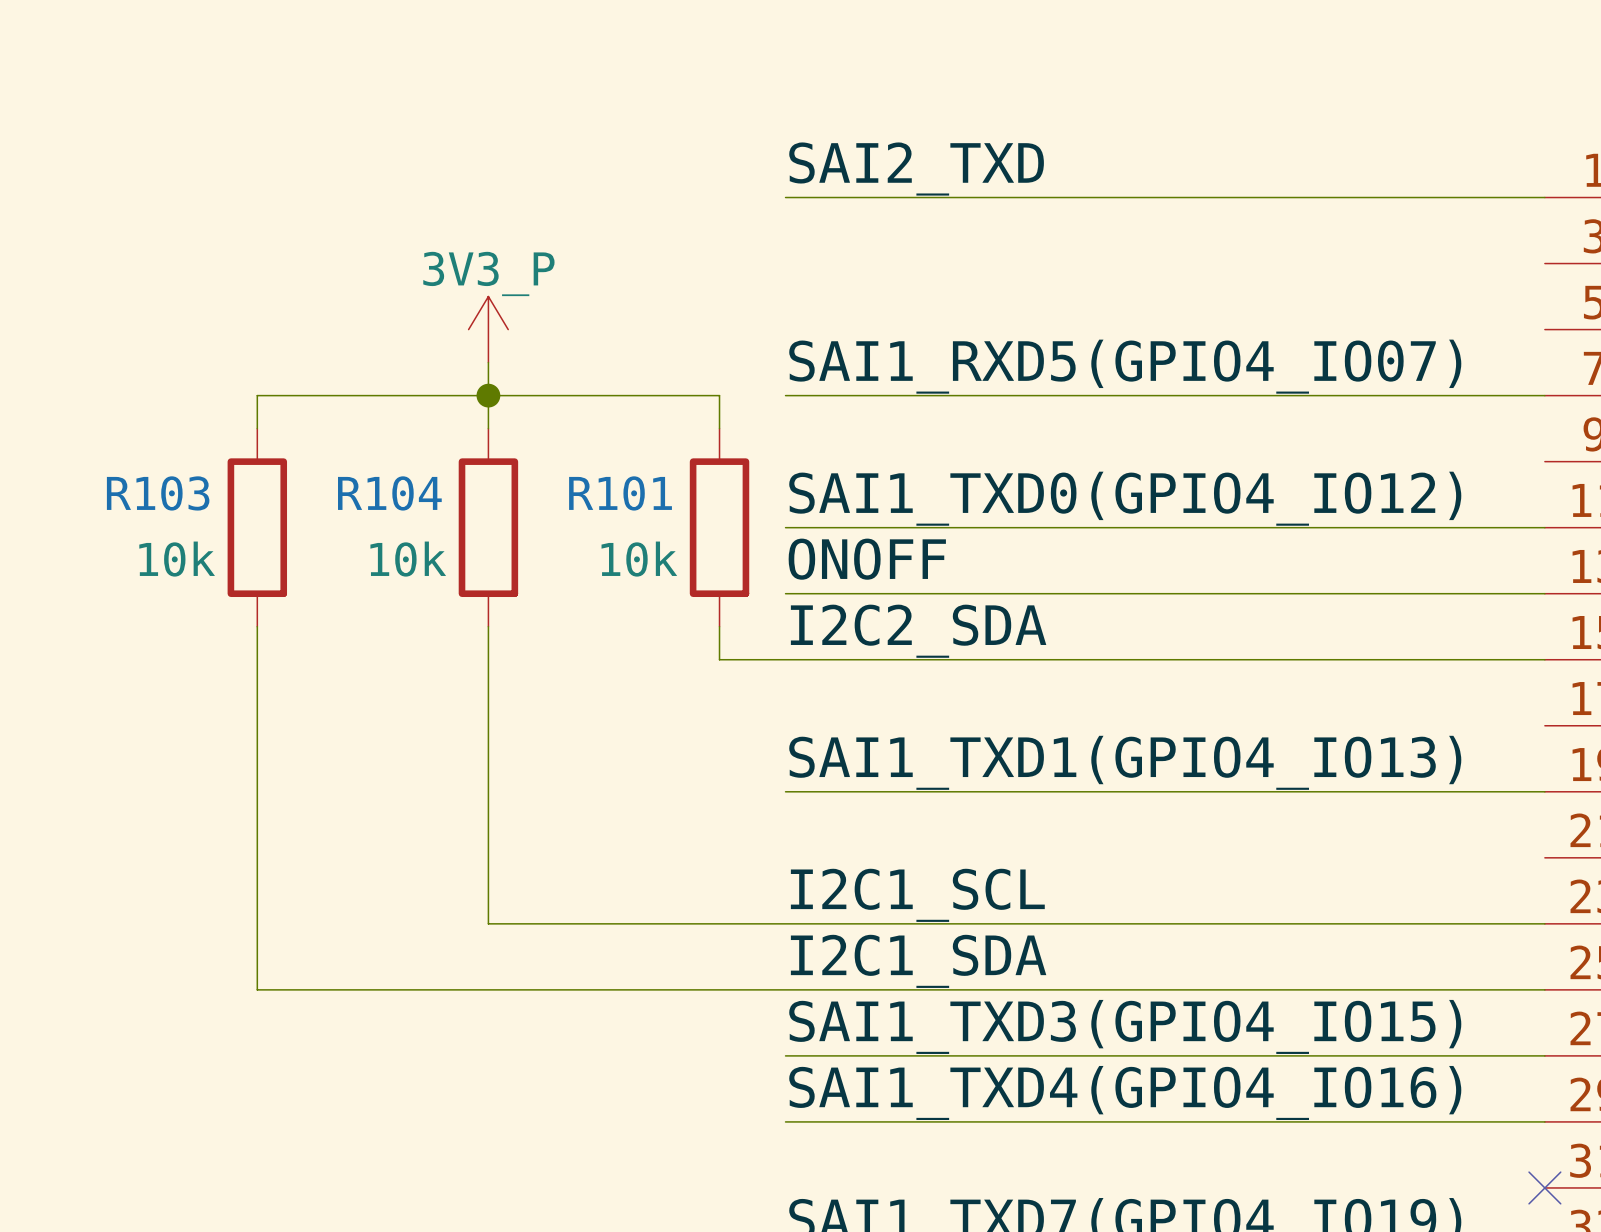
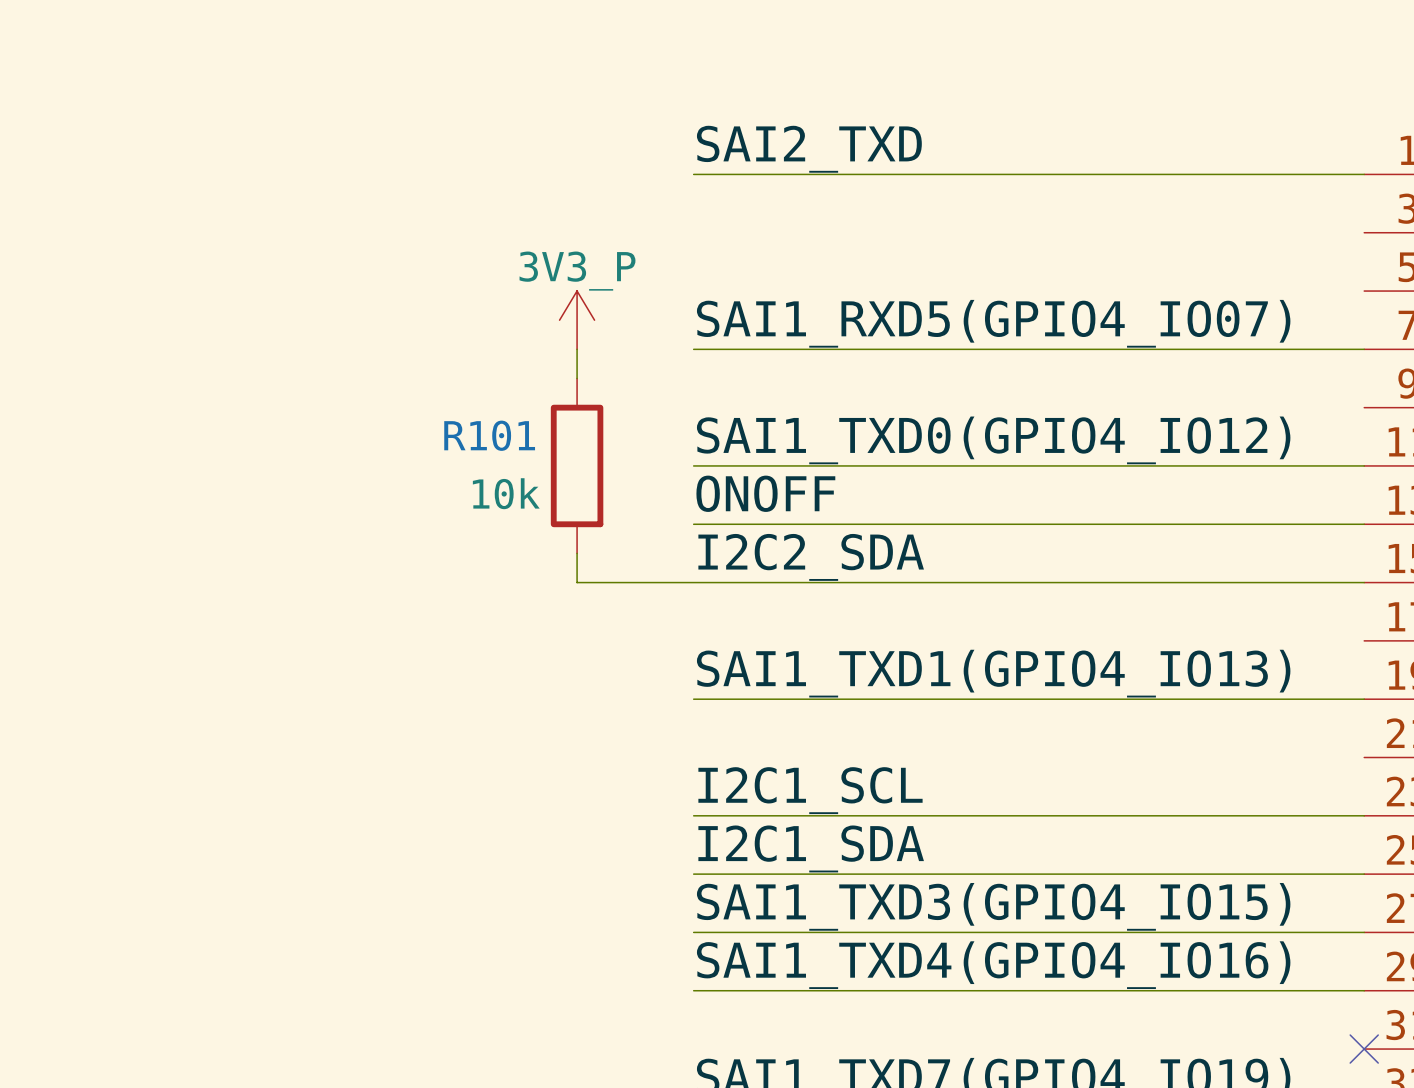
power symbol position: 3V3_P (488, 329) -> 3V3_P (577, 320)
wire: (488, 362) (488, 428) -> none
junction: (488, 395) -> none
wire: none -> (577, 349) (577, 378)
wire: (257, 428) (257, 395) (719, 395) (719, 428) -> none
R103: 10k (257, 527) -> none
R104: 10k (488, 527) -> none
R101 position: (719, 527) -> (577, 465)
wire: (257, 626) (257, 989) (785, 989) -> none
wire: (488, 626) (488, 923) (785, 923) -> none
wire: (719, 626) (719, 659) -> (577, 553) (577, 582) (635, 582)

